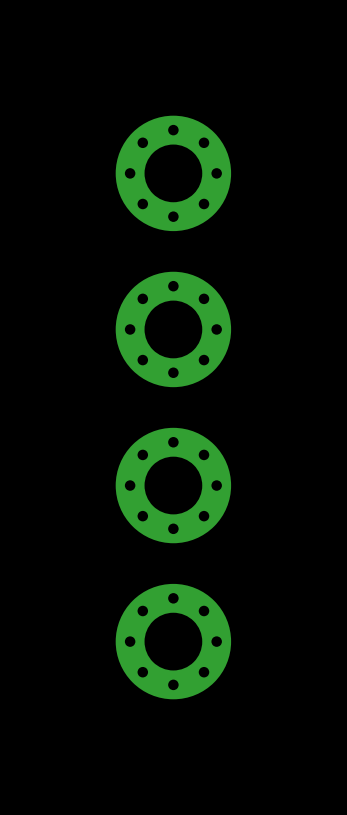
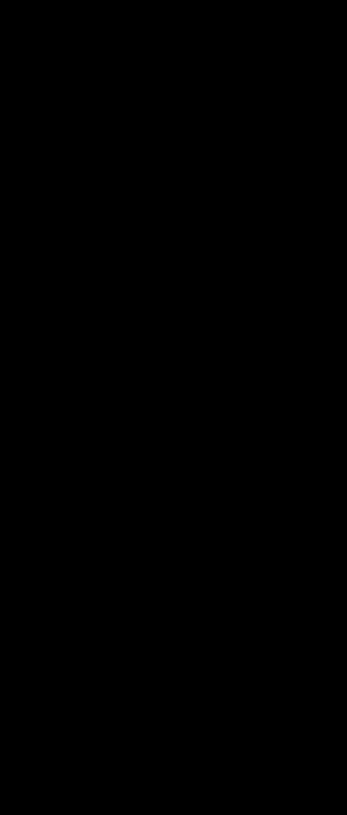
part: (173, 173) -> none
part: (173, 329) -> none
part: (173, 485) -> none
part: (173, 641) -> none

